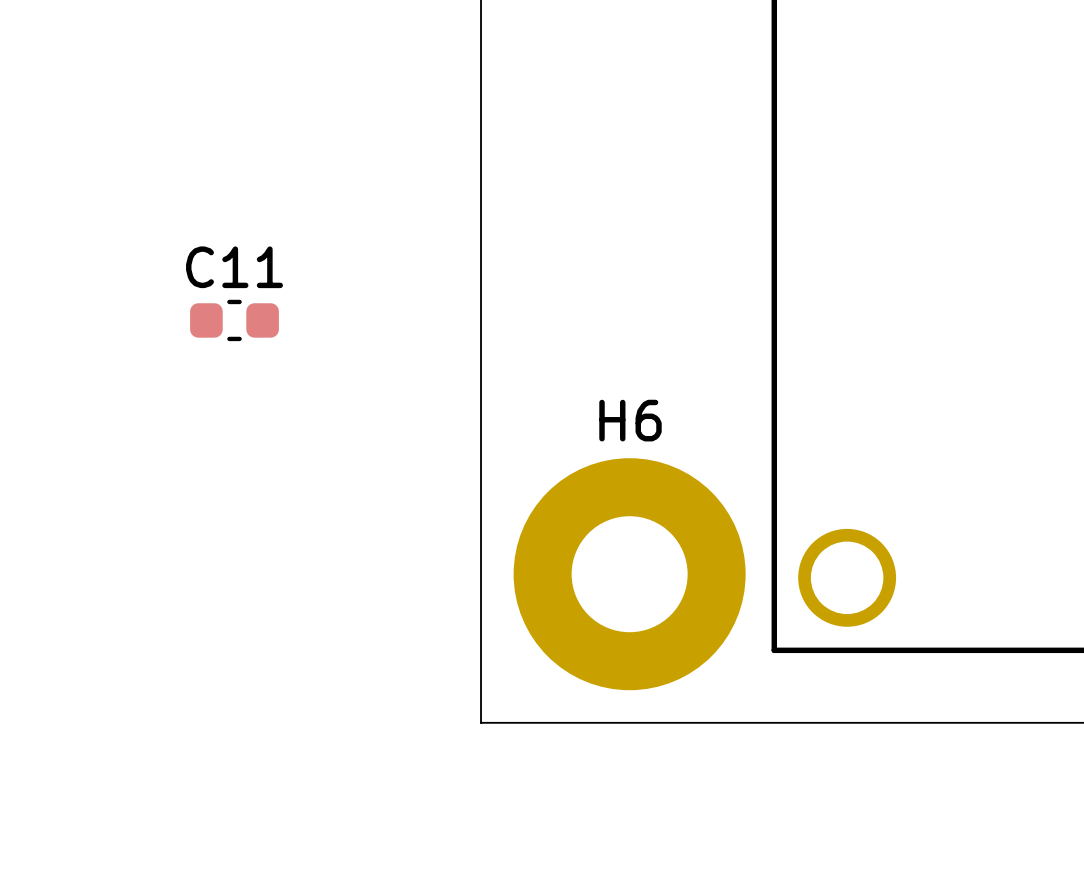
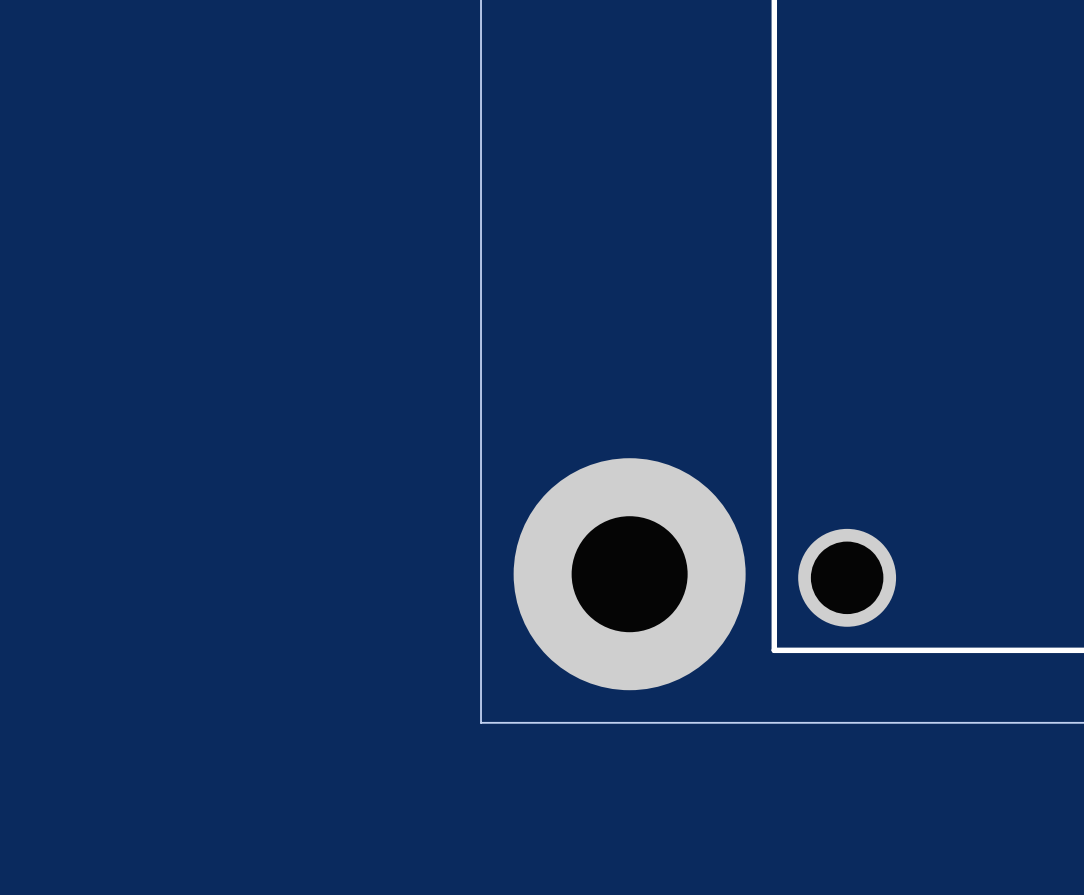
C11: (234, 320) -> none
H6 name: H6 (630, 420) -> none

